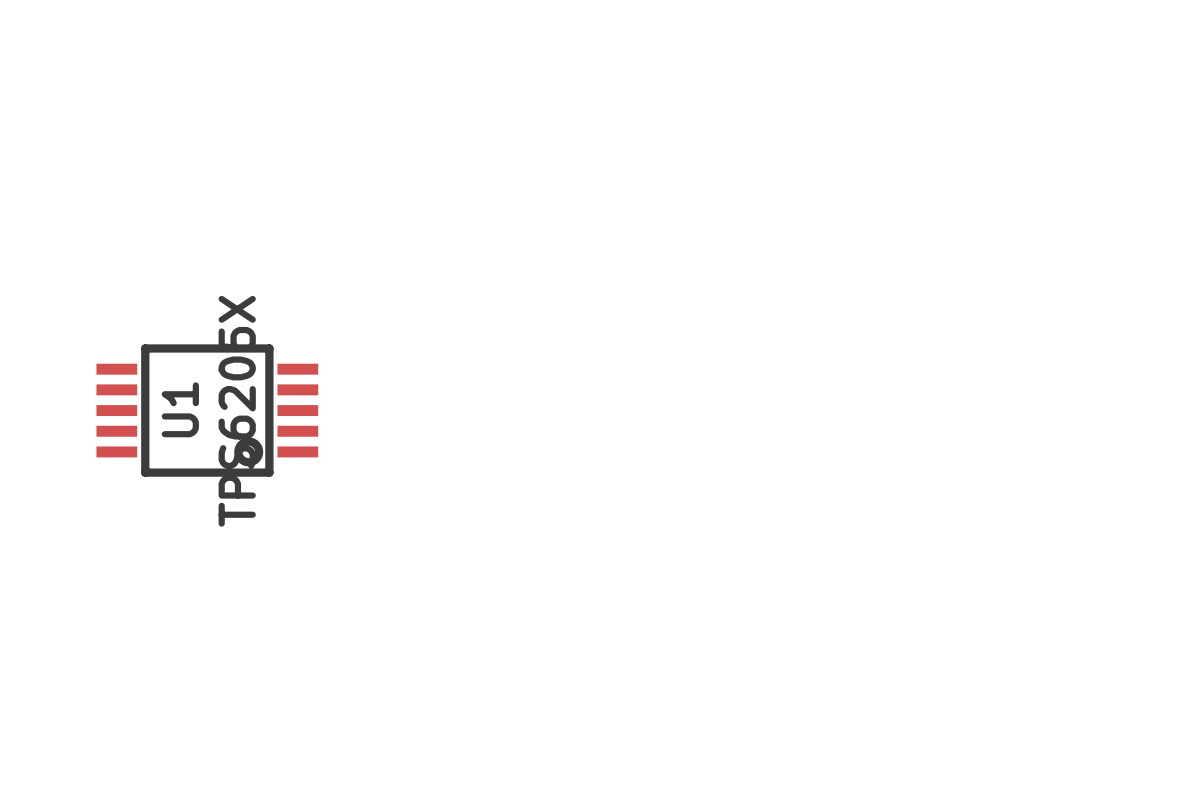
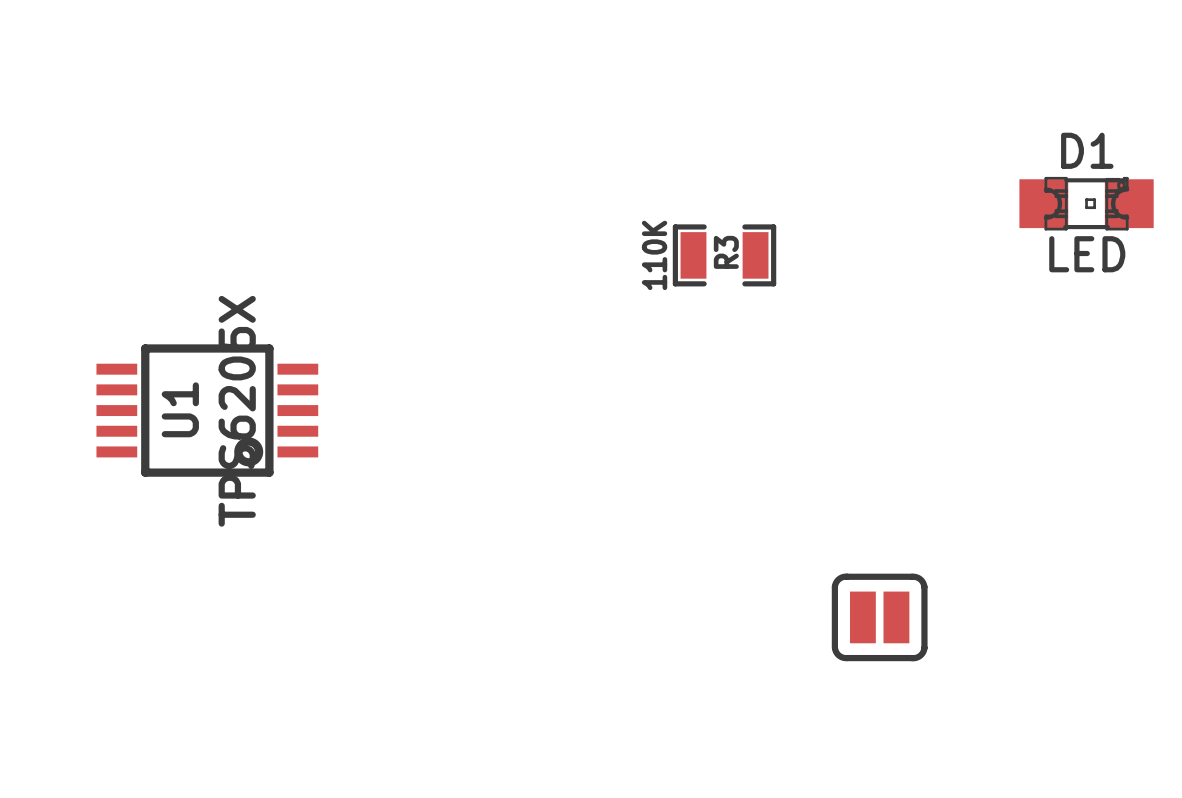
D1: none -> LED (1086, 203)
R3: none -> 110K (724, 255)
part: none -> (879, 617)

